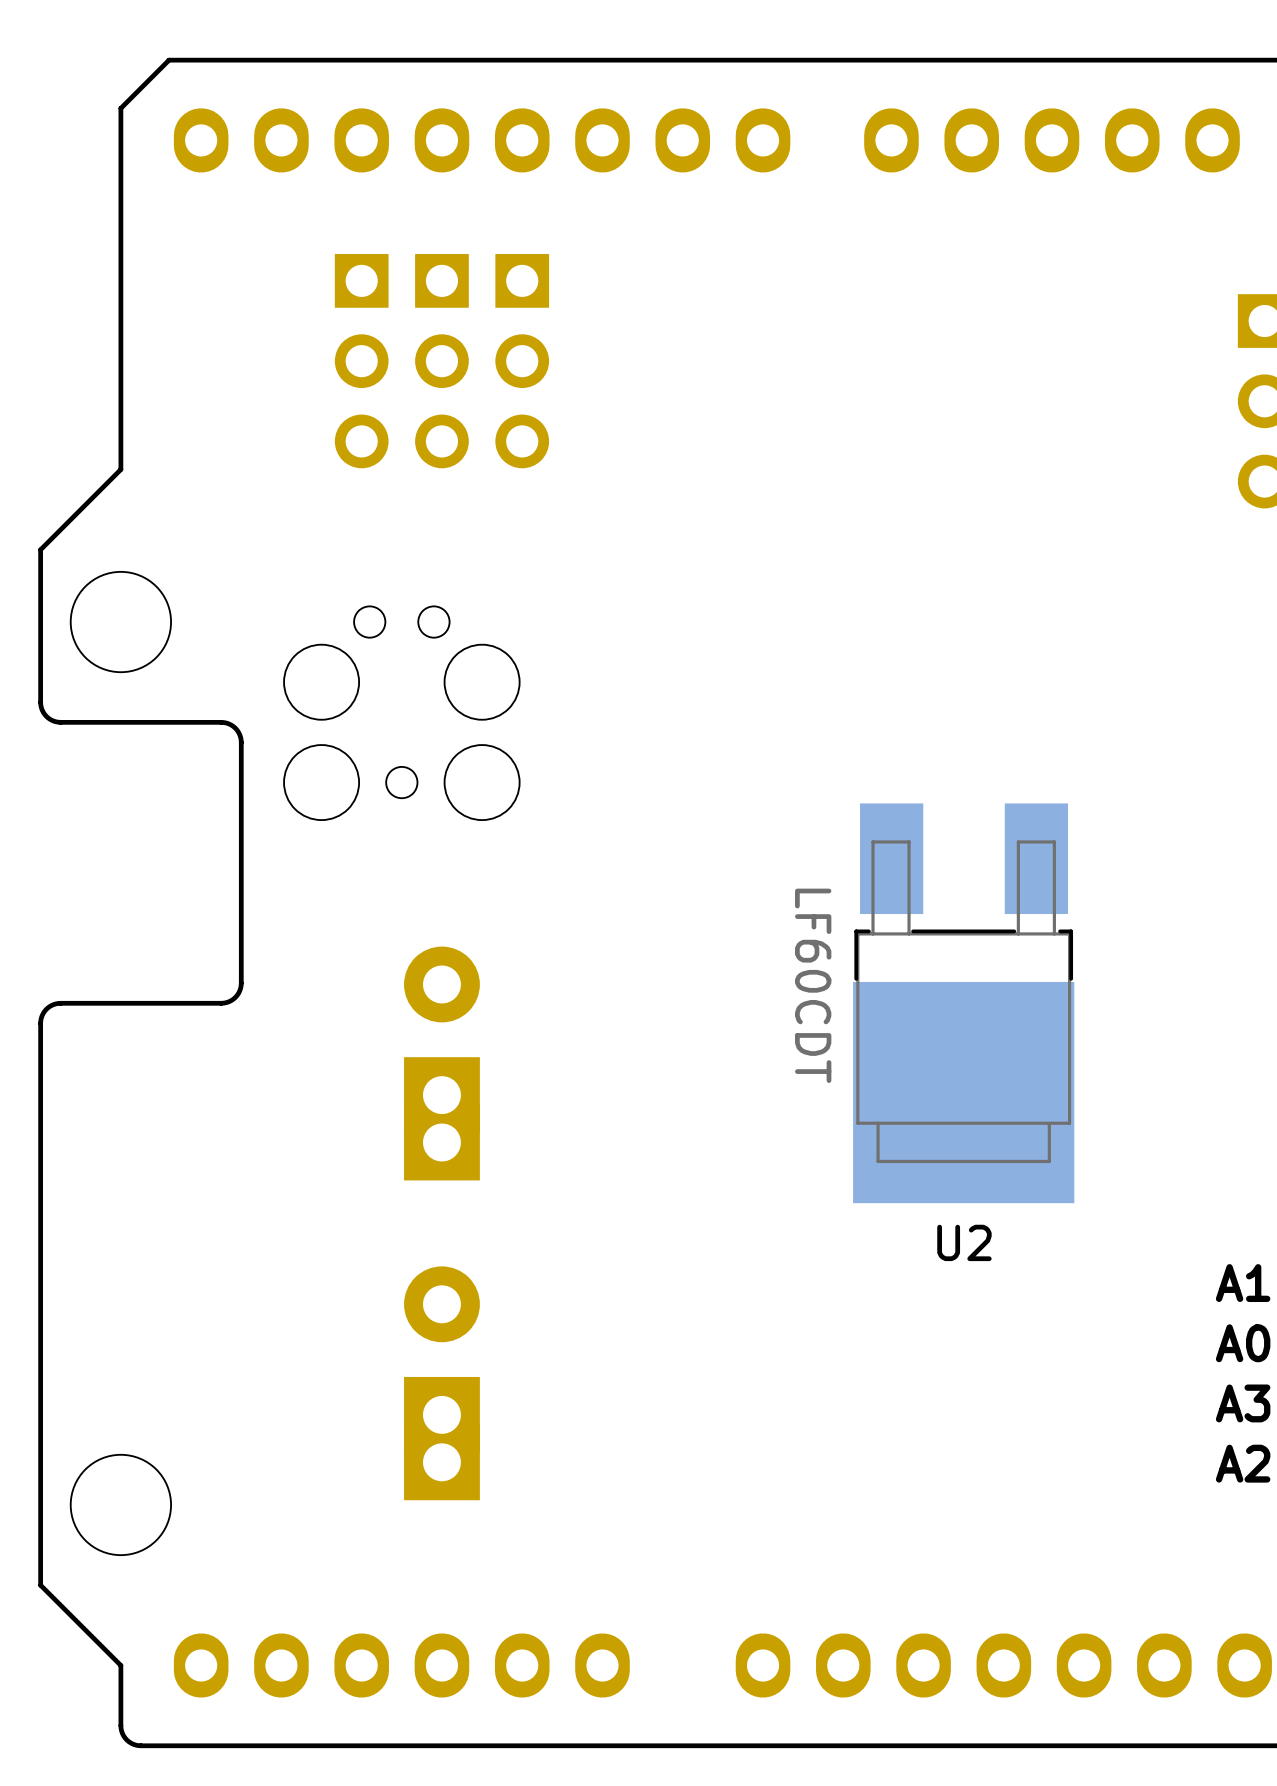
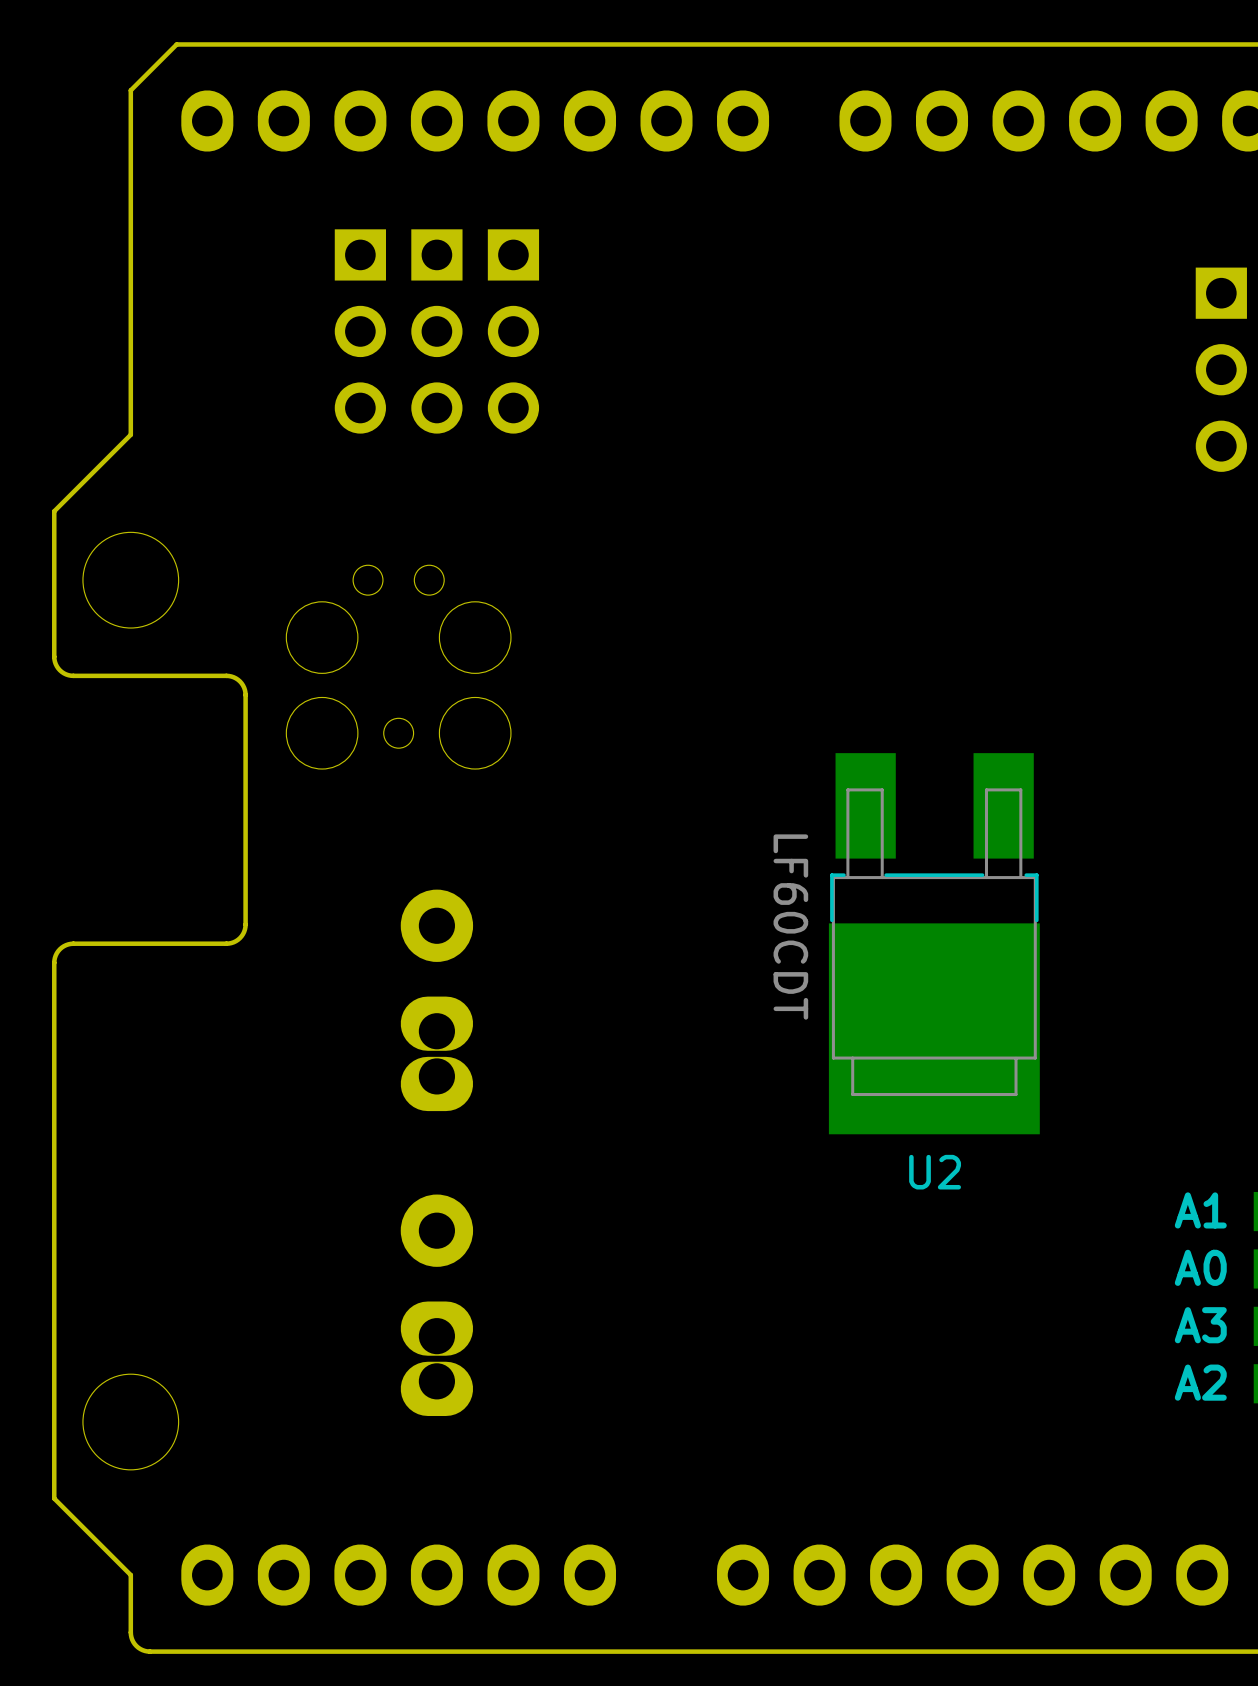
part footprint: [404, 946, 480, 1181] -> [400, 889, 474, 1112]
part footprint: [404, 1266, 480, 1501] -> [400, 1194, 474, 1416]

